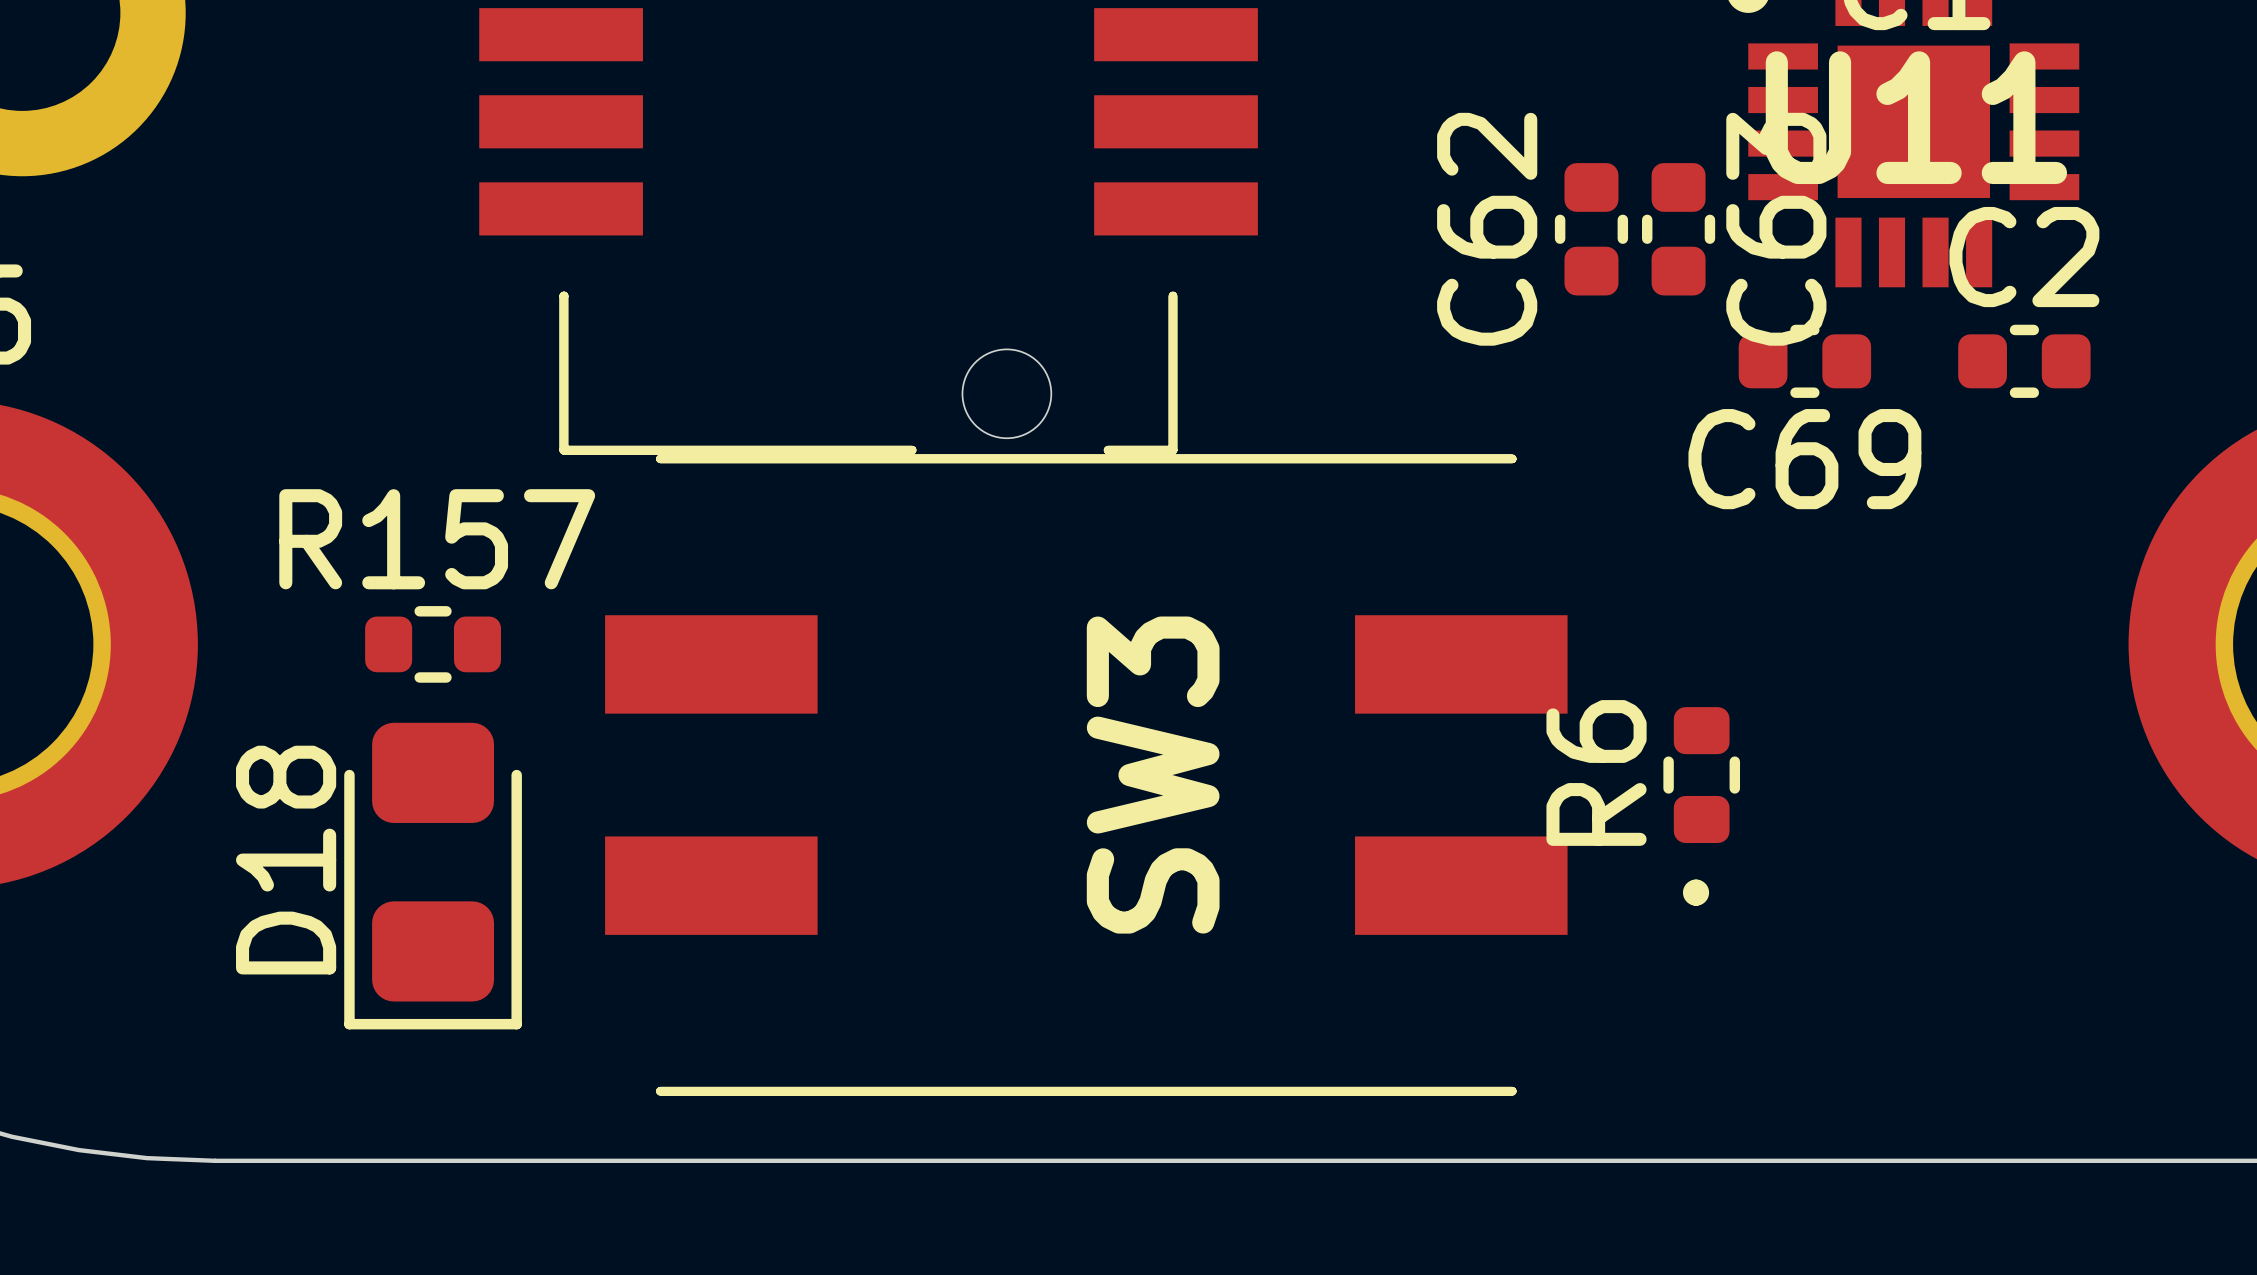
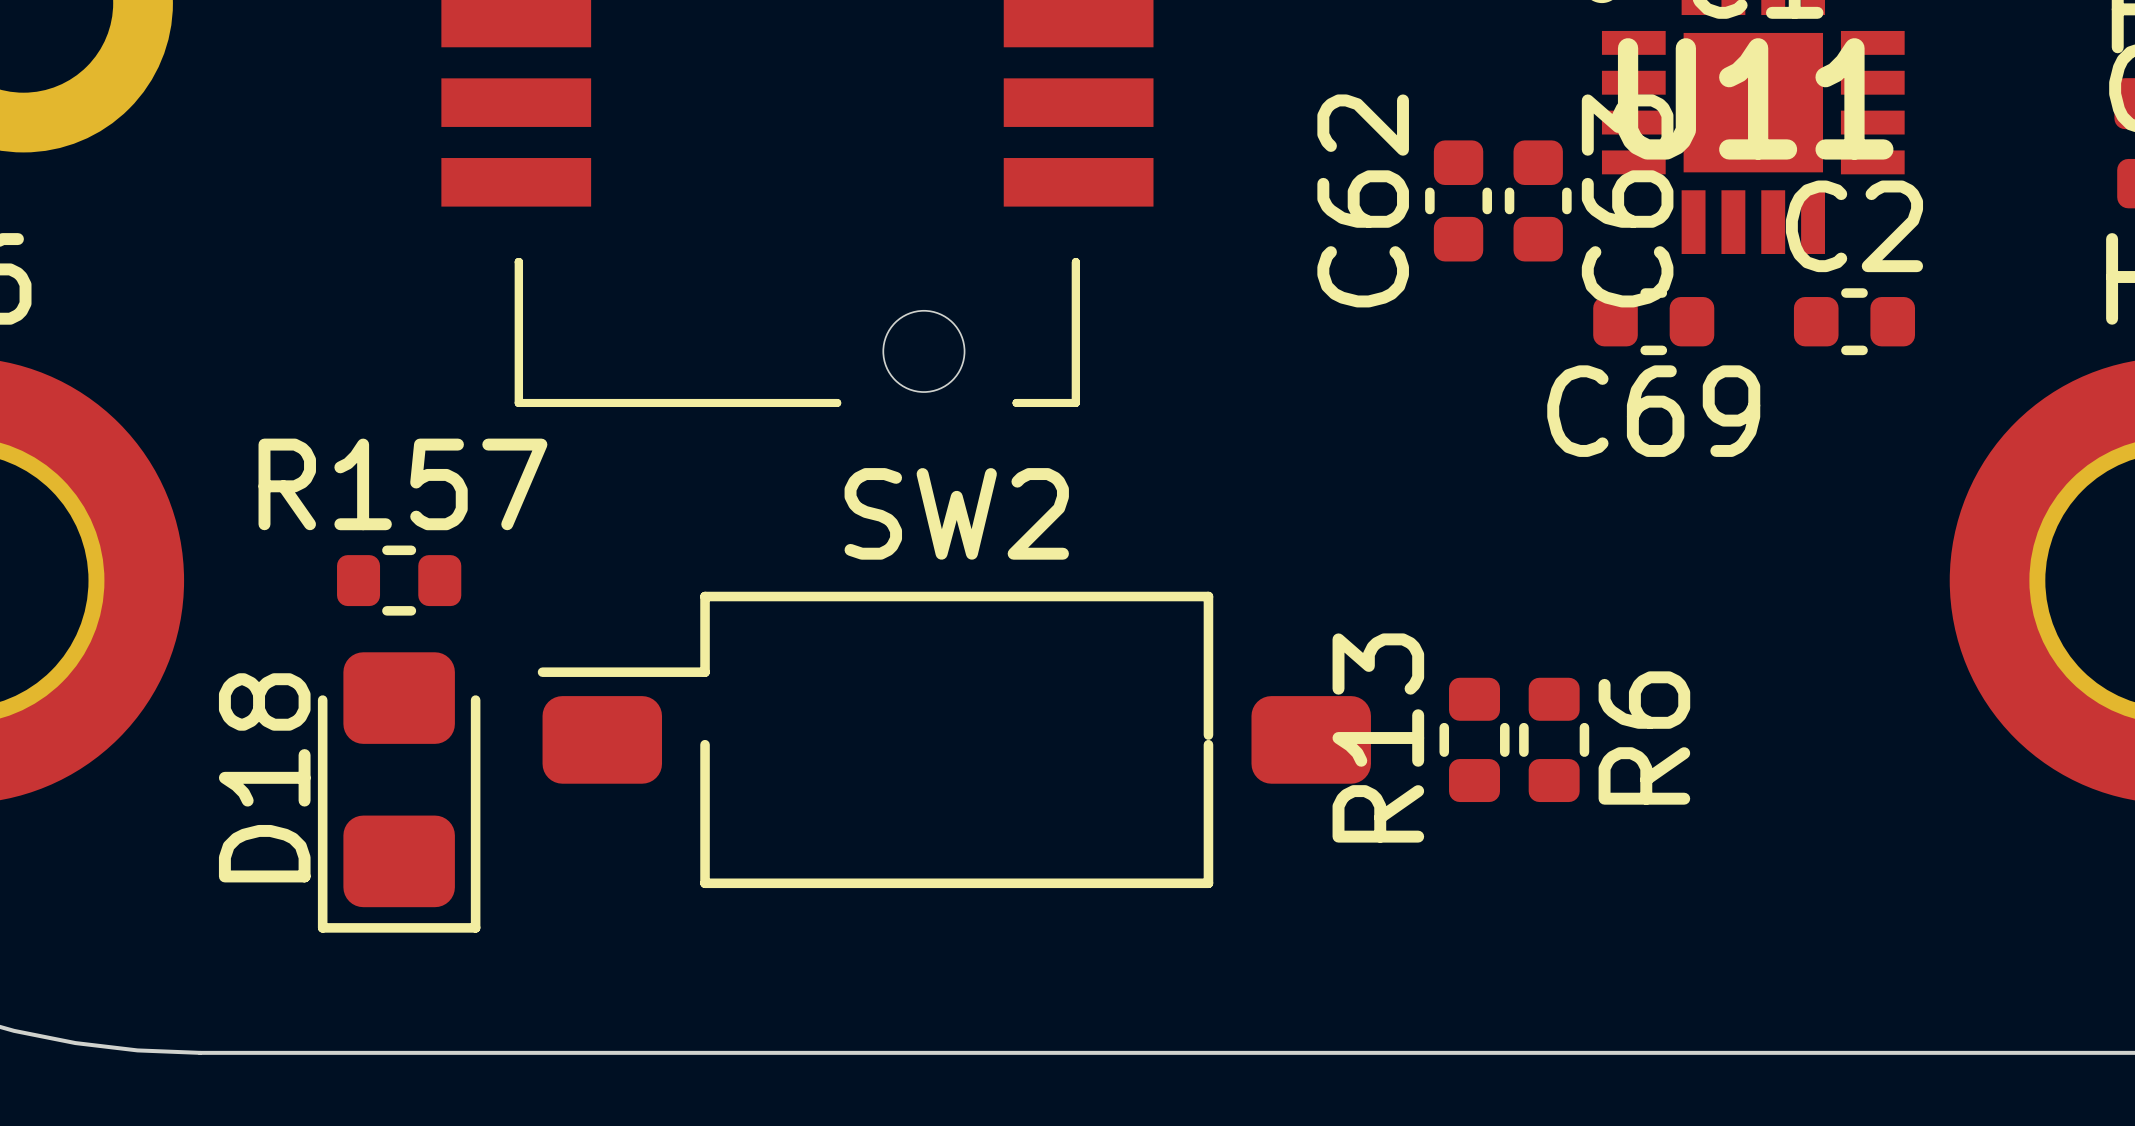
R6 name position: R6 (1596, 772) -> R6 (1644, 738)
SW3: (1157, 775) -> none
R6 position: (1701, 775) -> (1554, 739)
SW2: none -> (954, 739)
R13: none -> (1474, 739)

